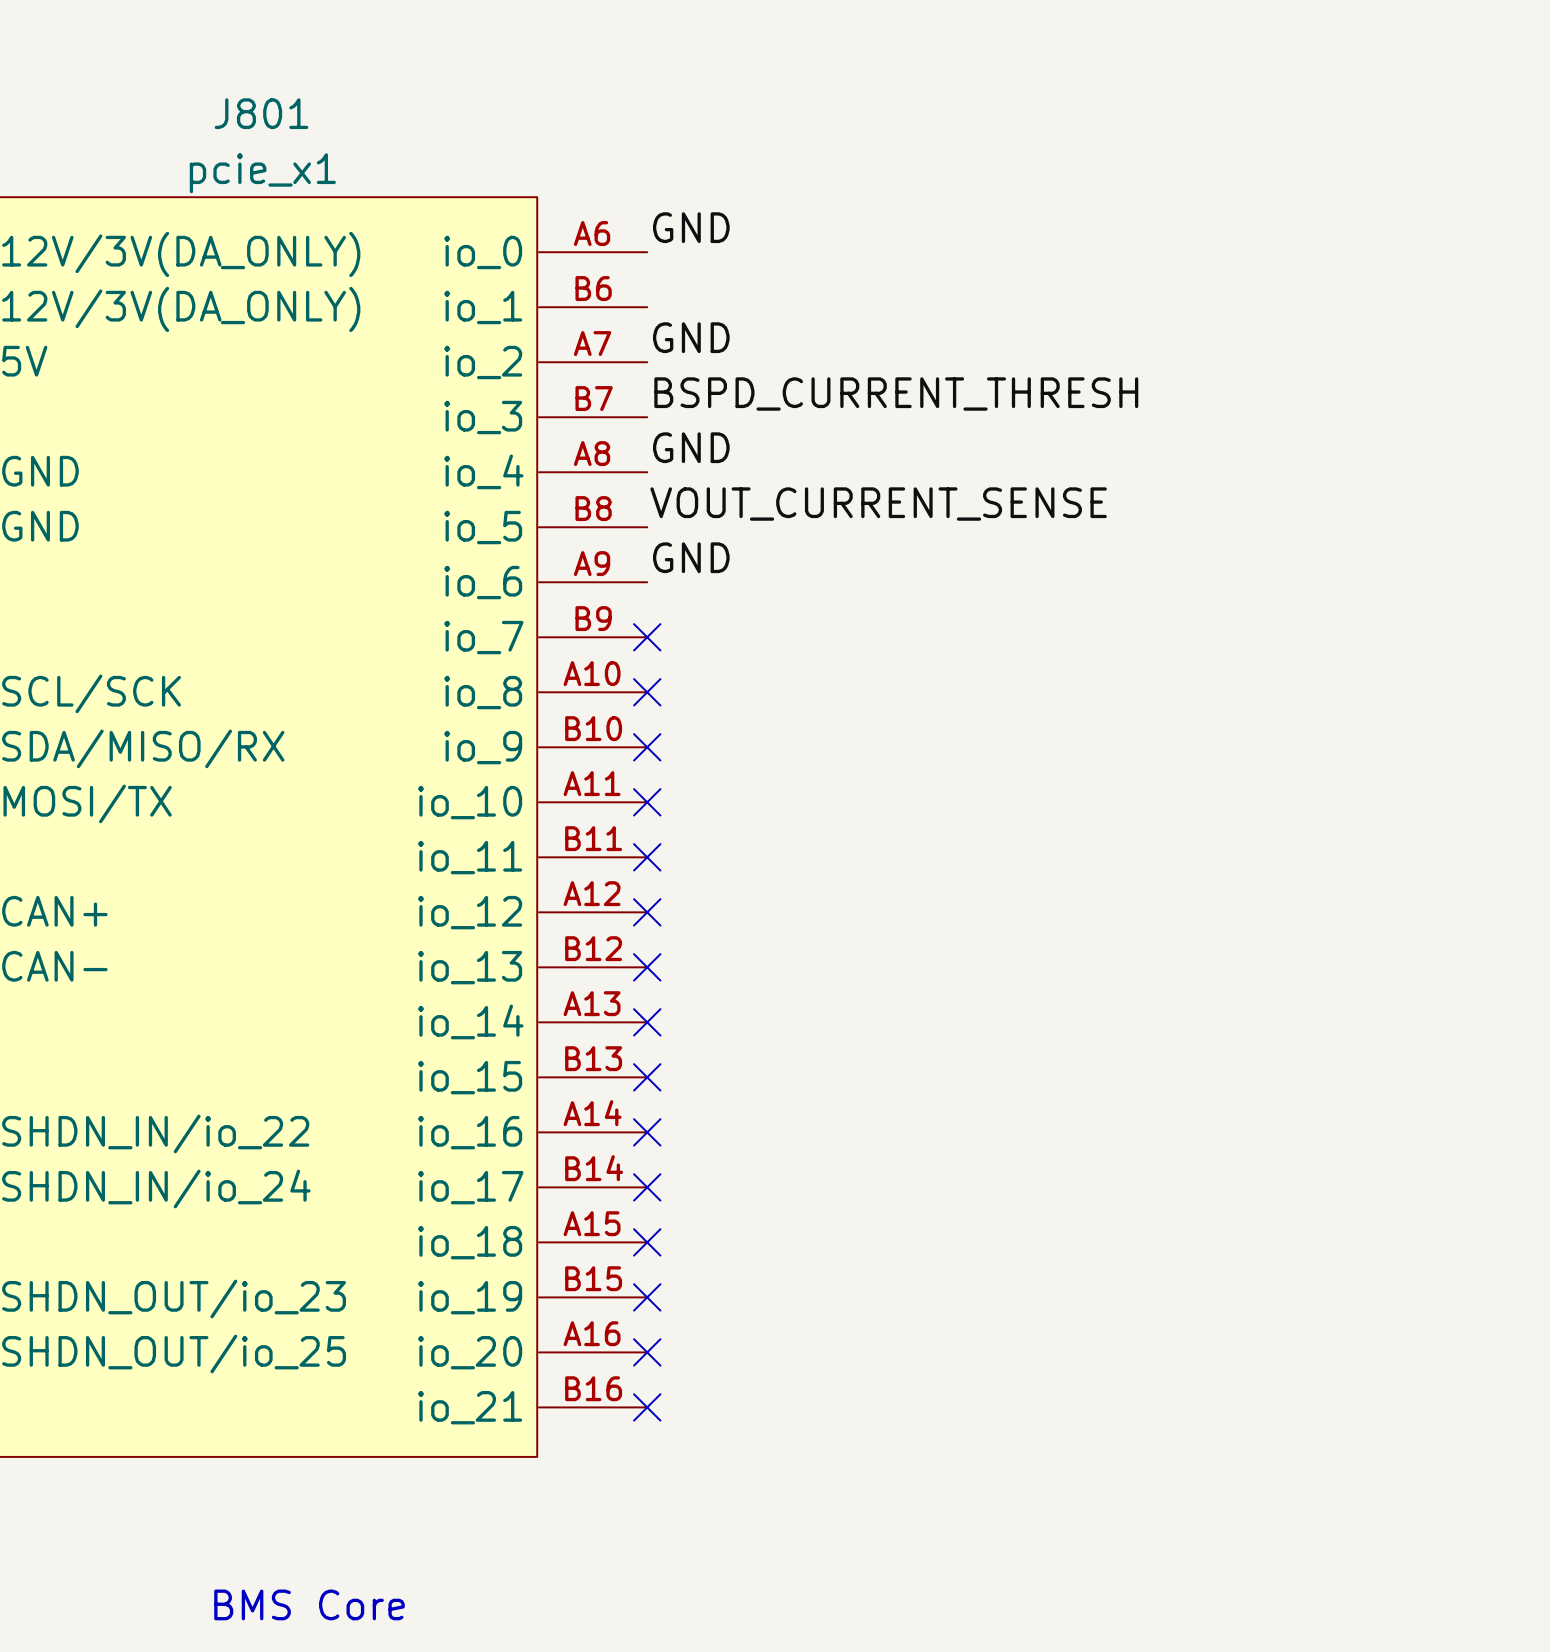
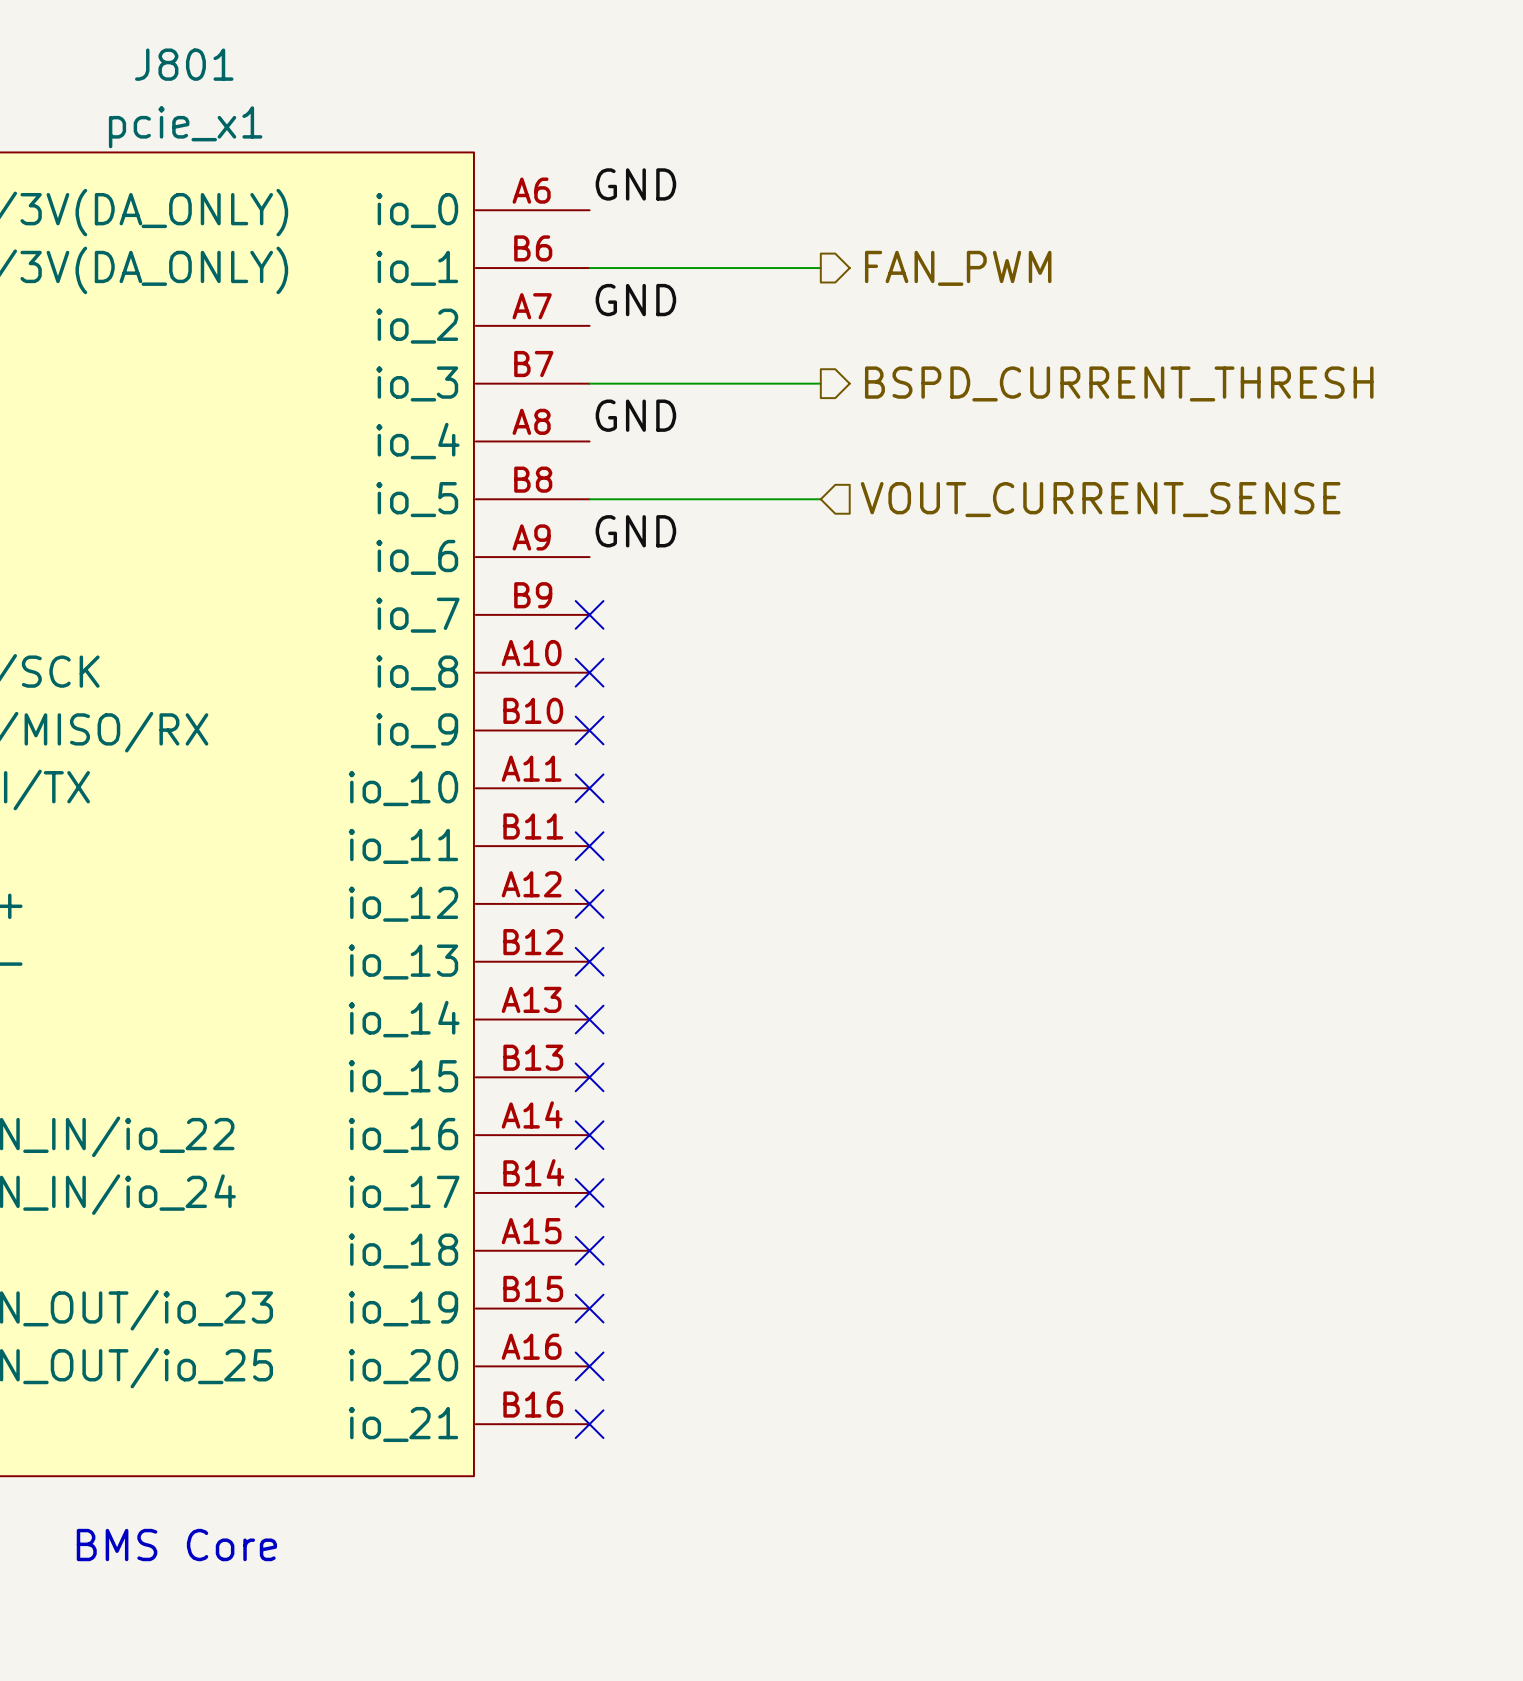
wire: none -> (589, 268) (820, 268)
hierarchical label: none -> FAN_PWM (958, 268)
label: BSPD_CURRENT_THRESH (896, 394) -> none
wire: none -> (589, 383) (820, 383)
hierarchical label: none -> BSPD_CURRENT_THRESH (1119, 383)
label: VOUT_CURRENT_SENSE (878, 504) -> none
wire: none -> (589, 499) (820, 499)
hierarchical label: none -> VOUT_CURRENT_SENSE (1100, 499)
text position: BMS Core (309, 1604) -> BMS Core (176, 1545)

